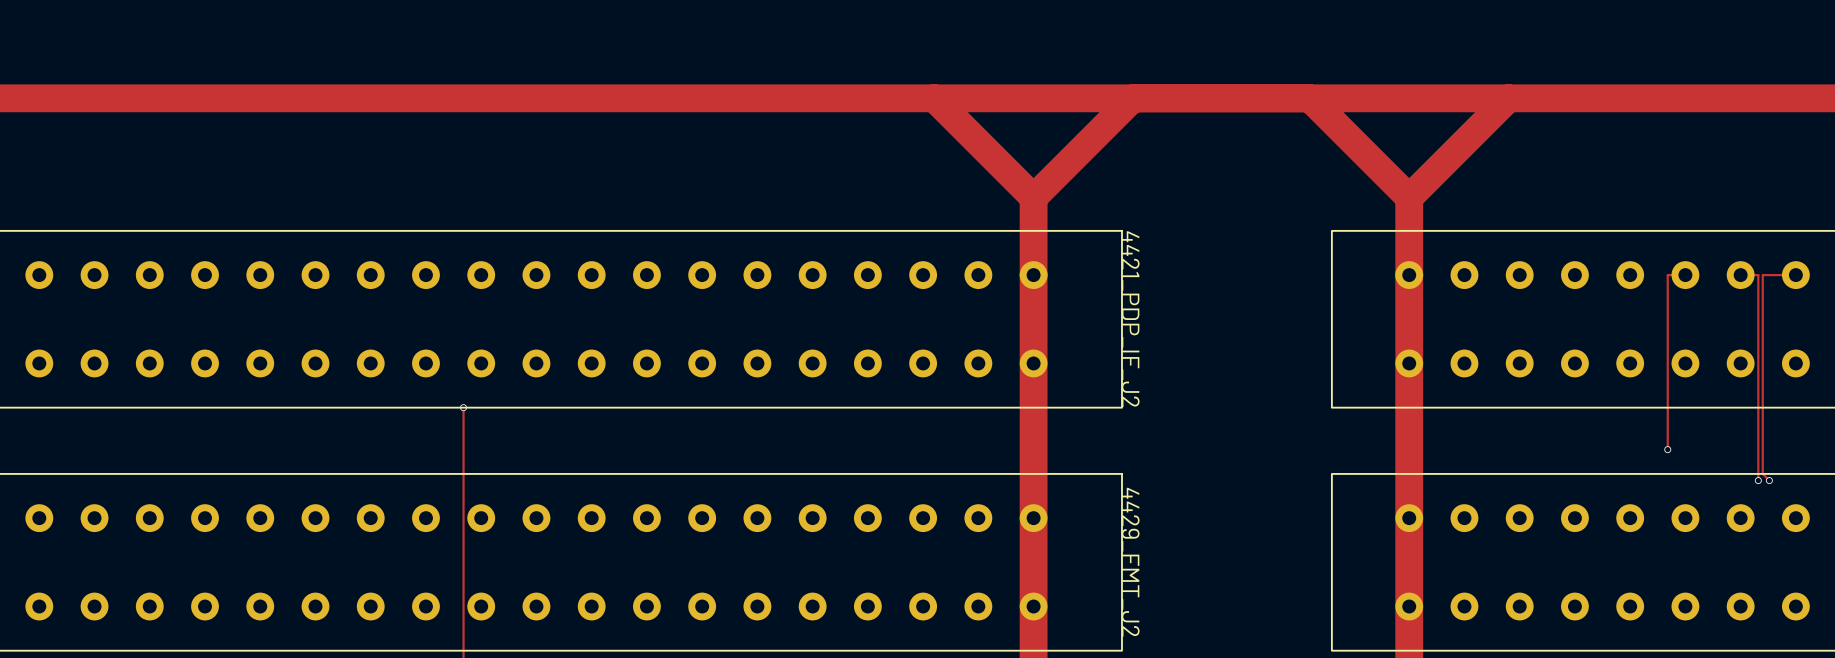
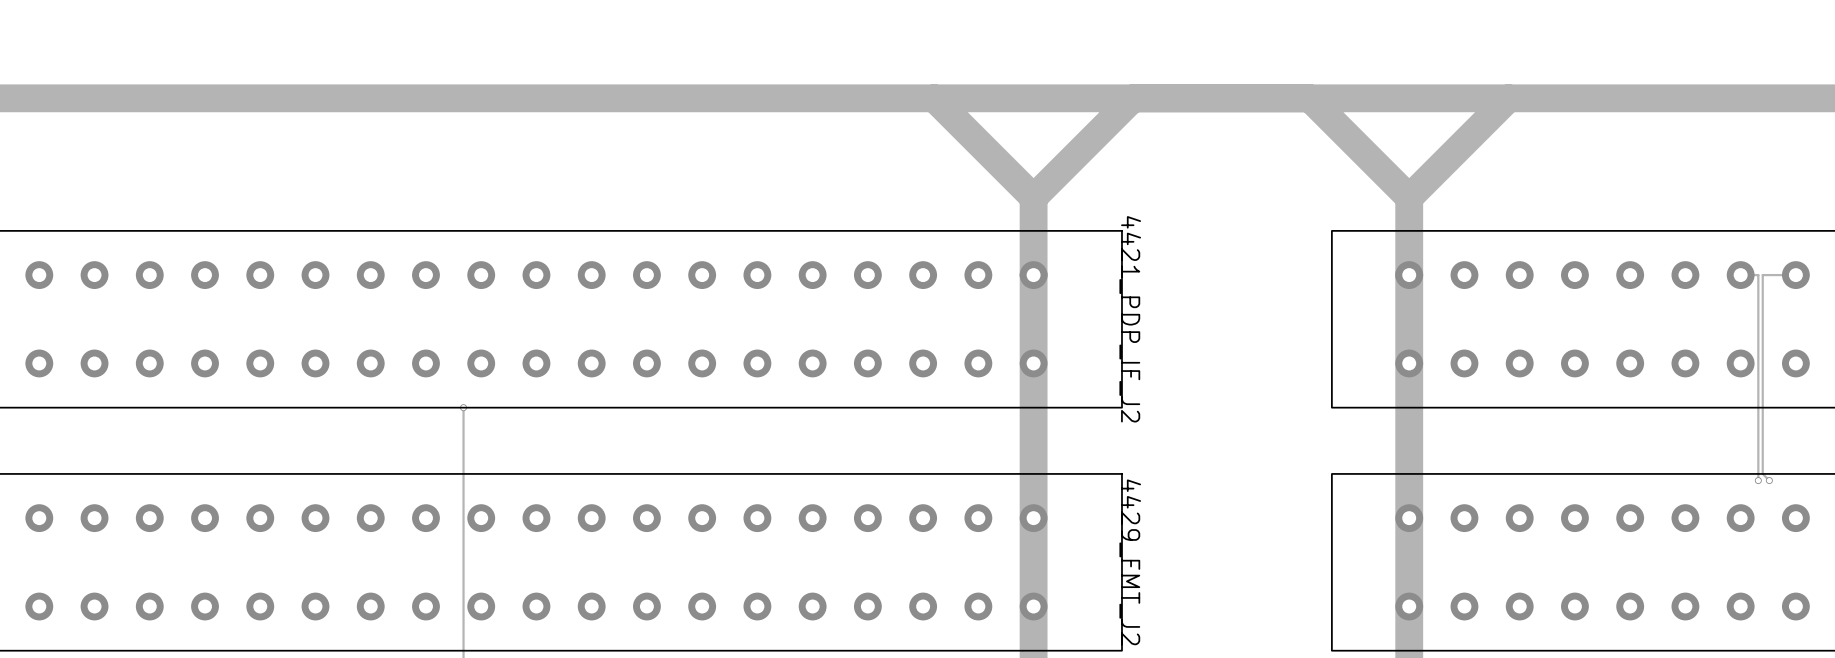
track: (1685, 275) (1667, 275) (1667, 449) -> none
via: (1667, 449) -> none

